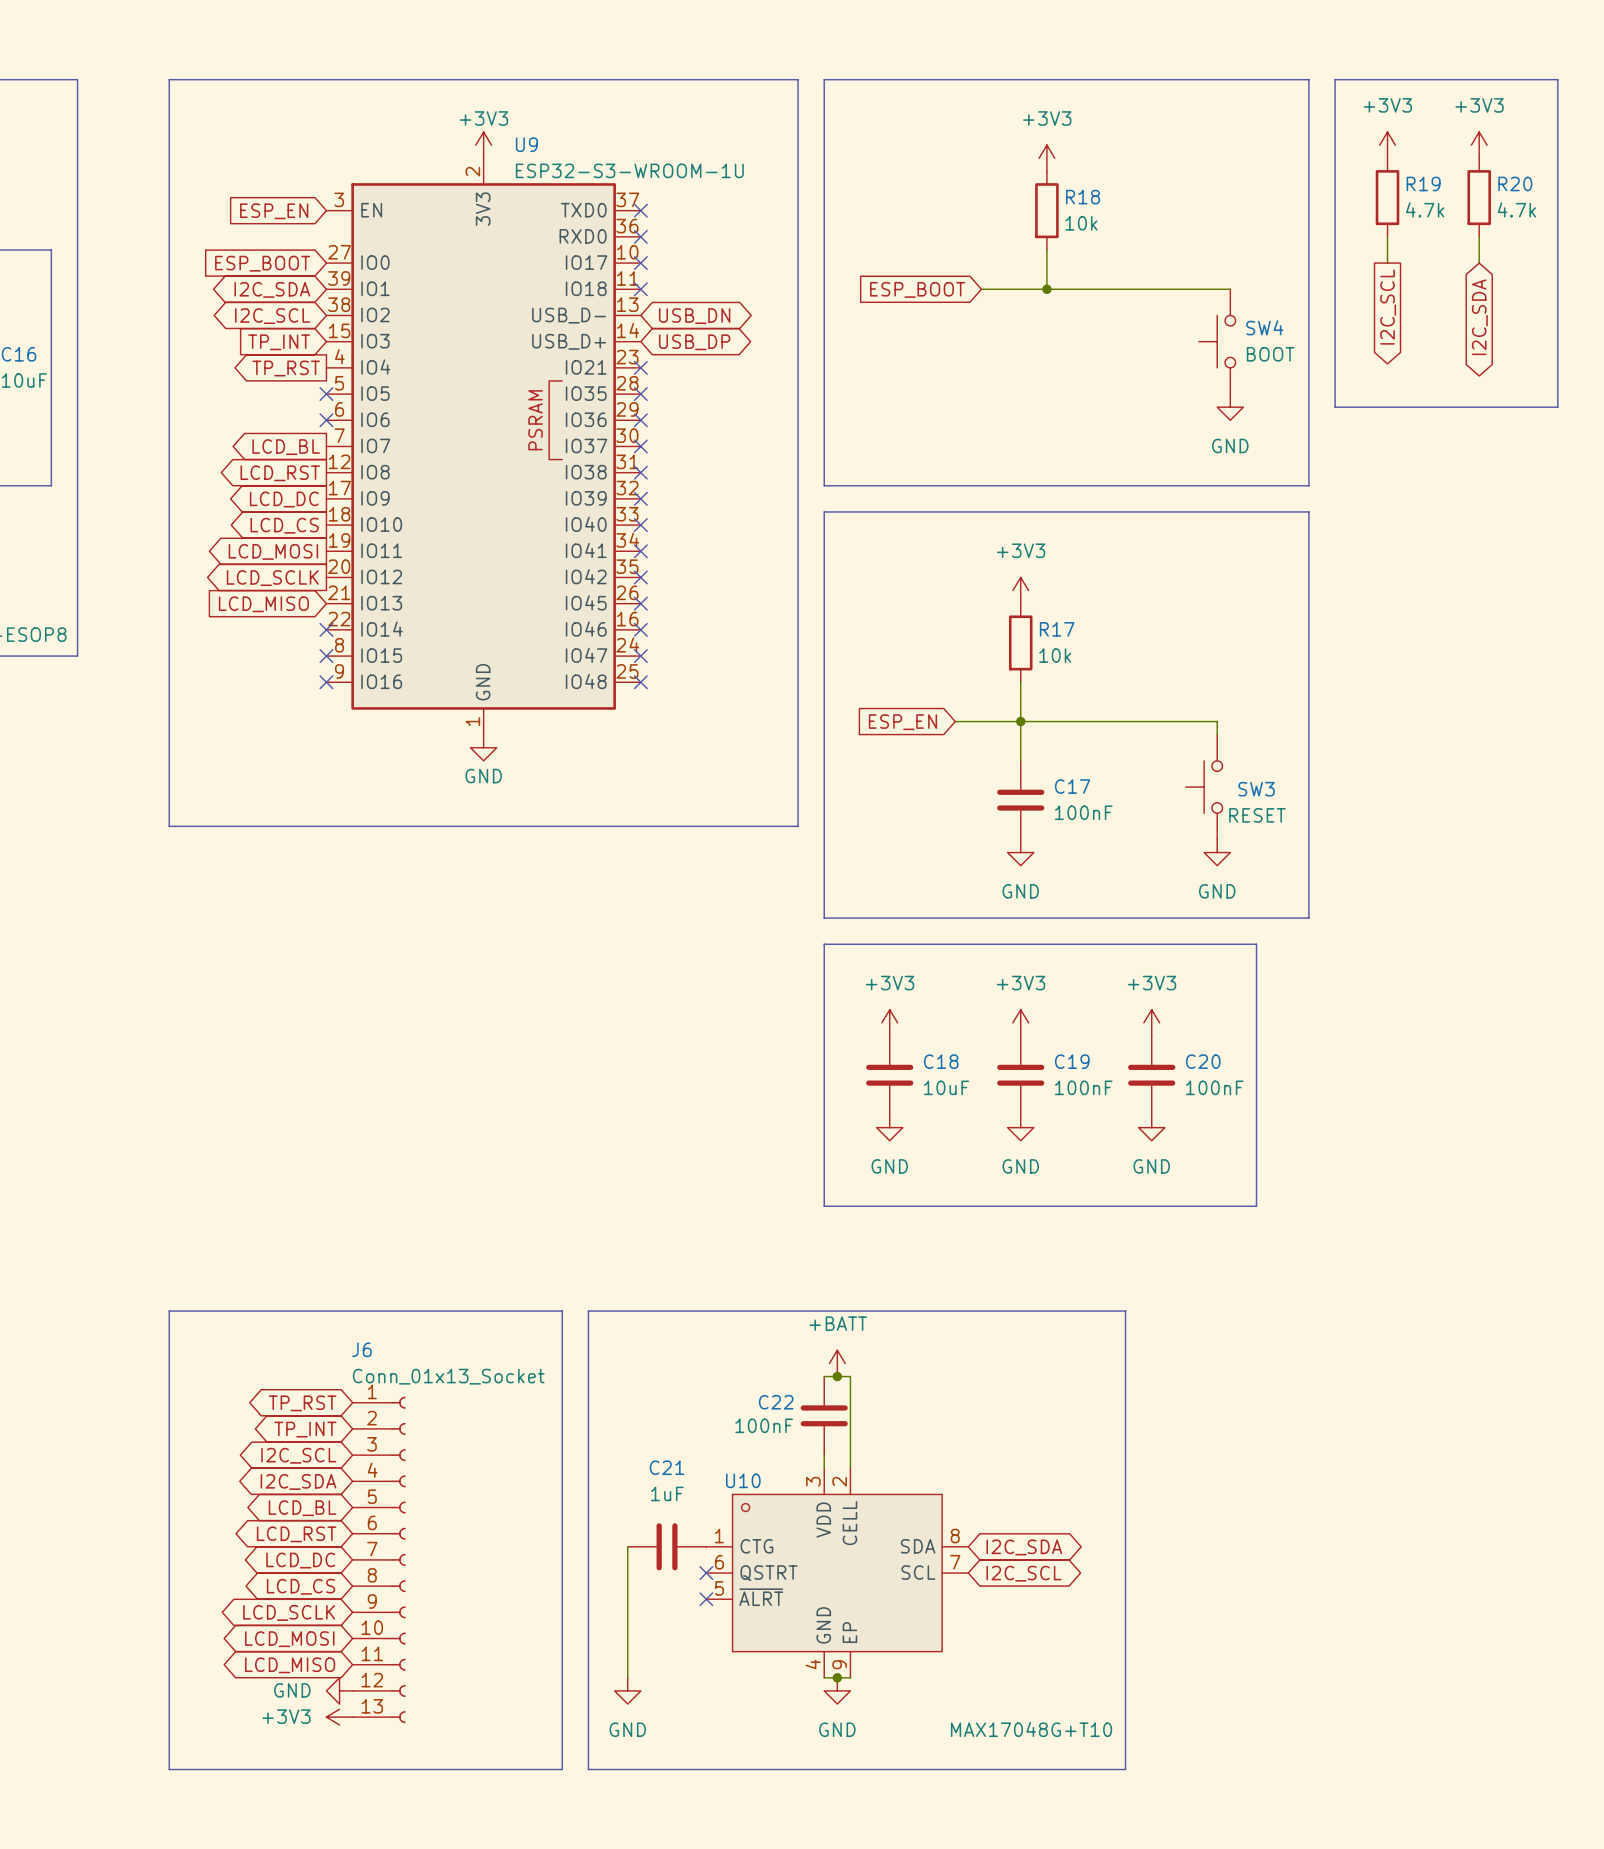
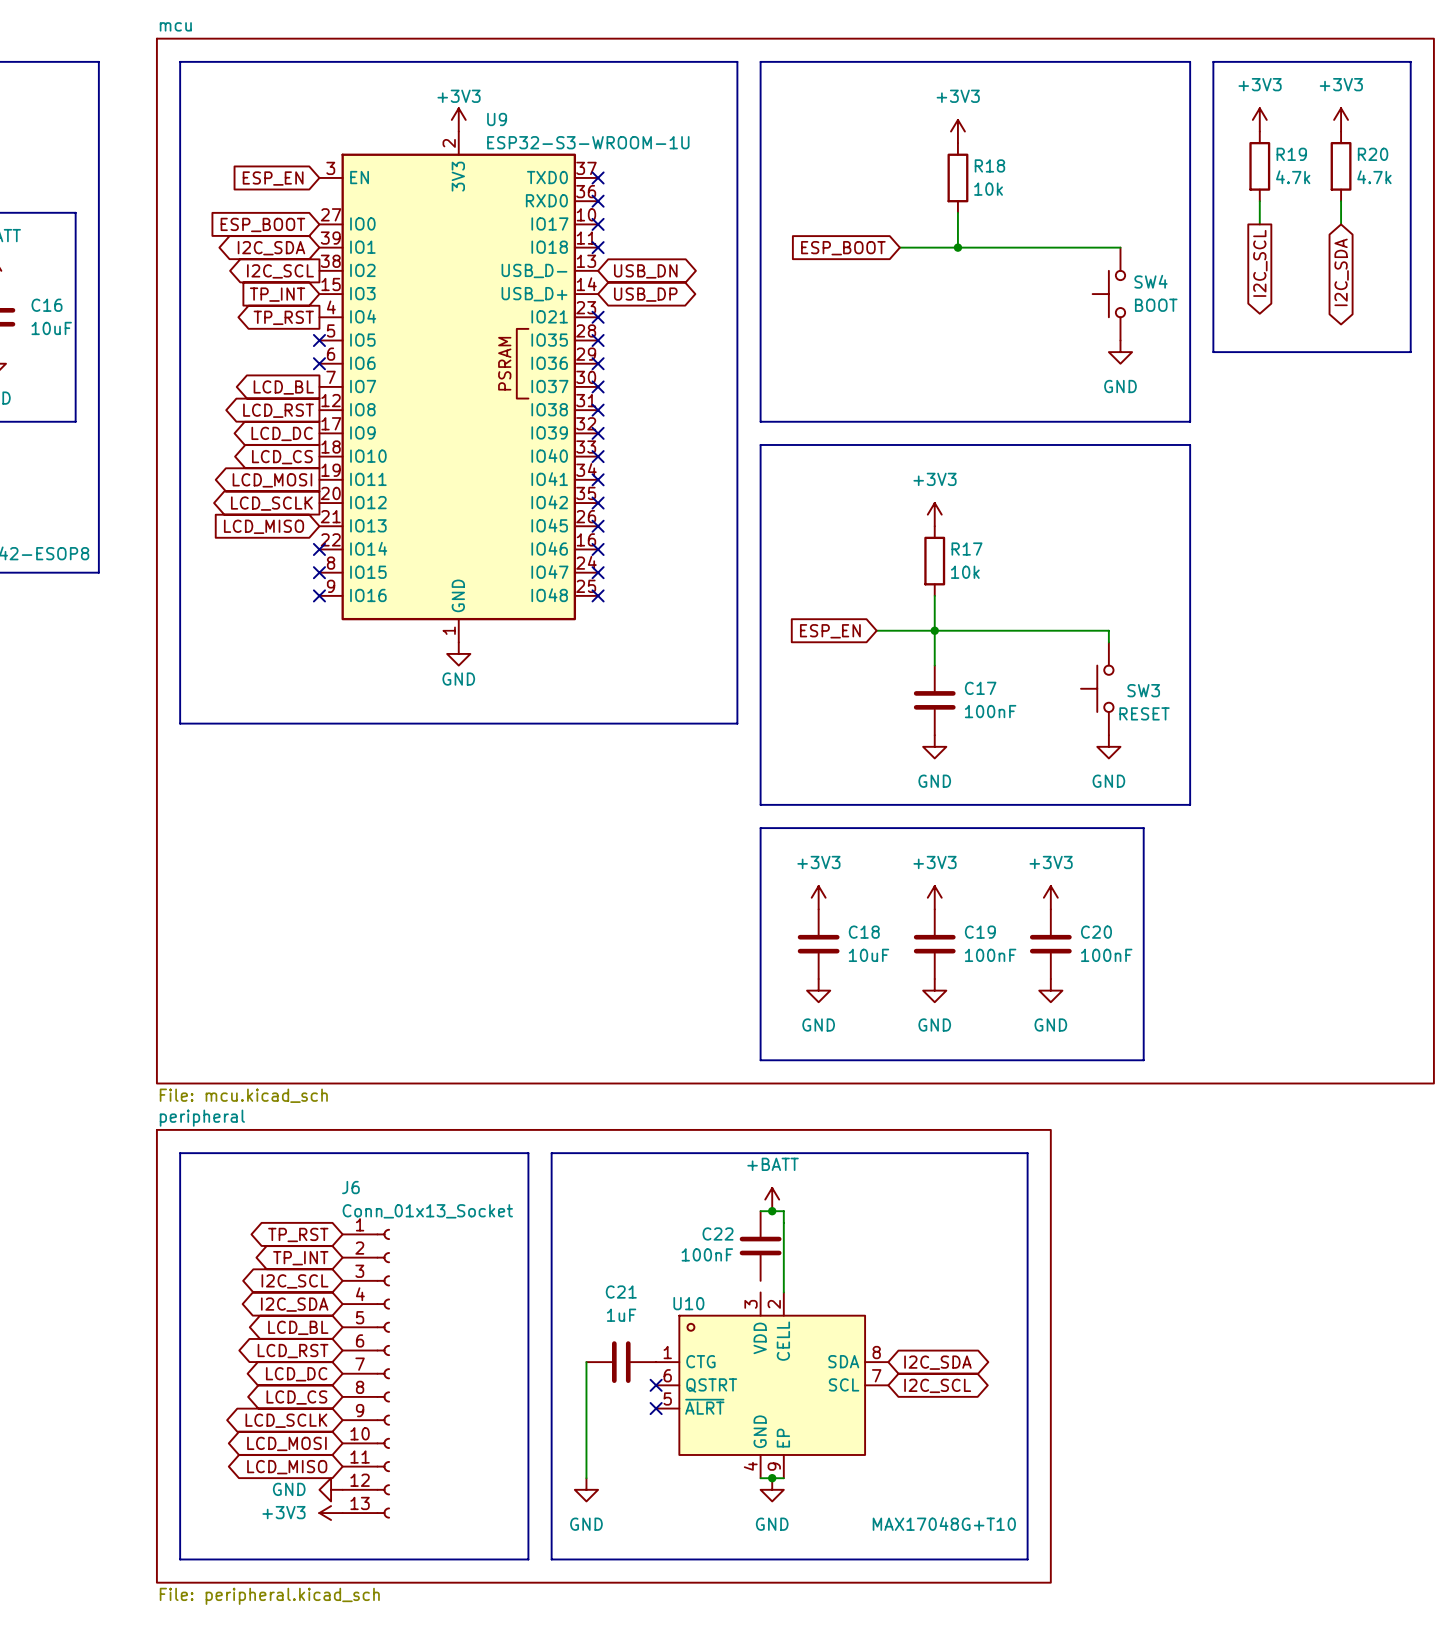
global label shape: bidirectional (272, 316) -> output (280, 271)
sheet mcu: none -> File: mcu.kicad_sch (795, 561)
wire: (824, 1455) (824, 1468) -> none
sheet peripheral: none -> File: peripheral.kicad_sch (603, 1356)

